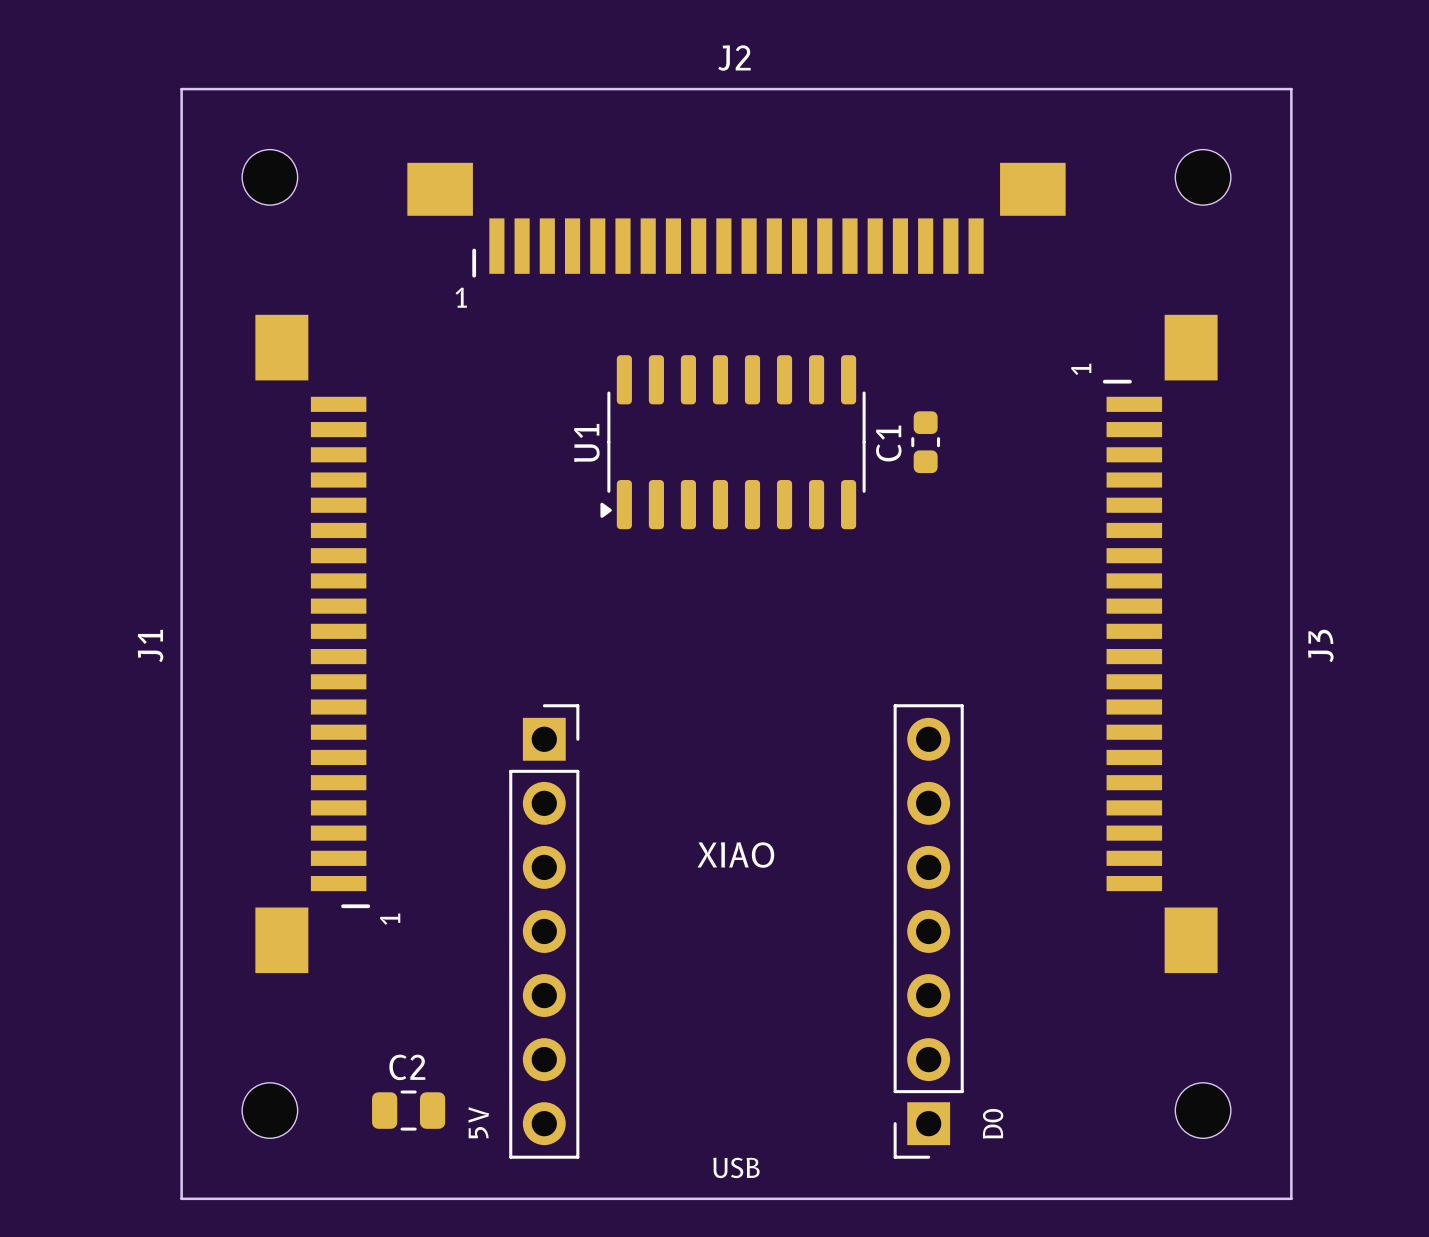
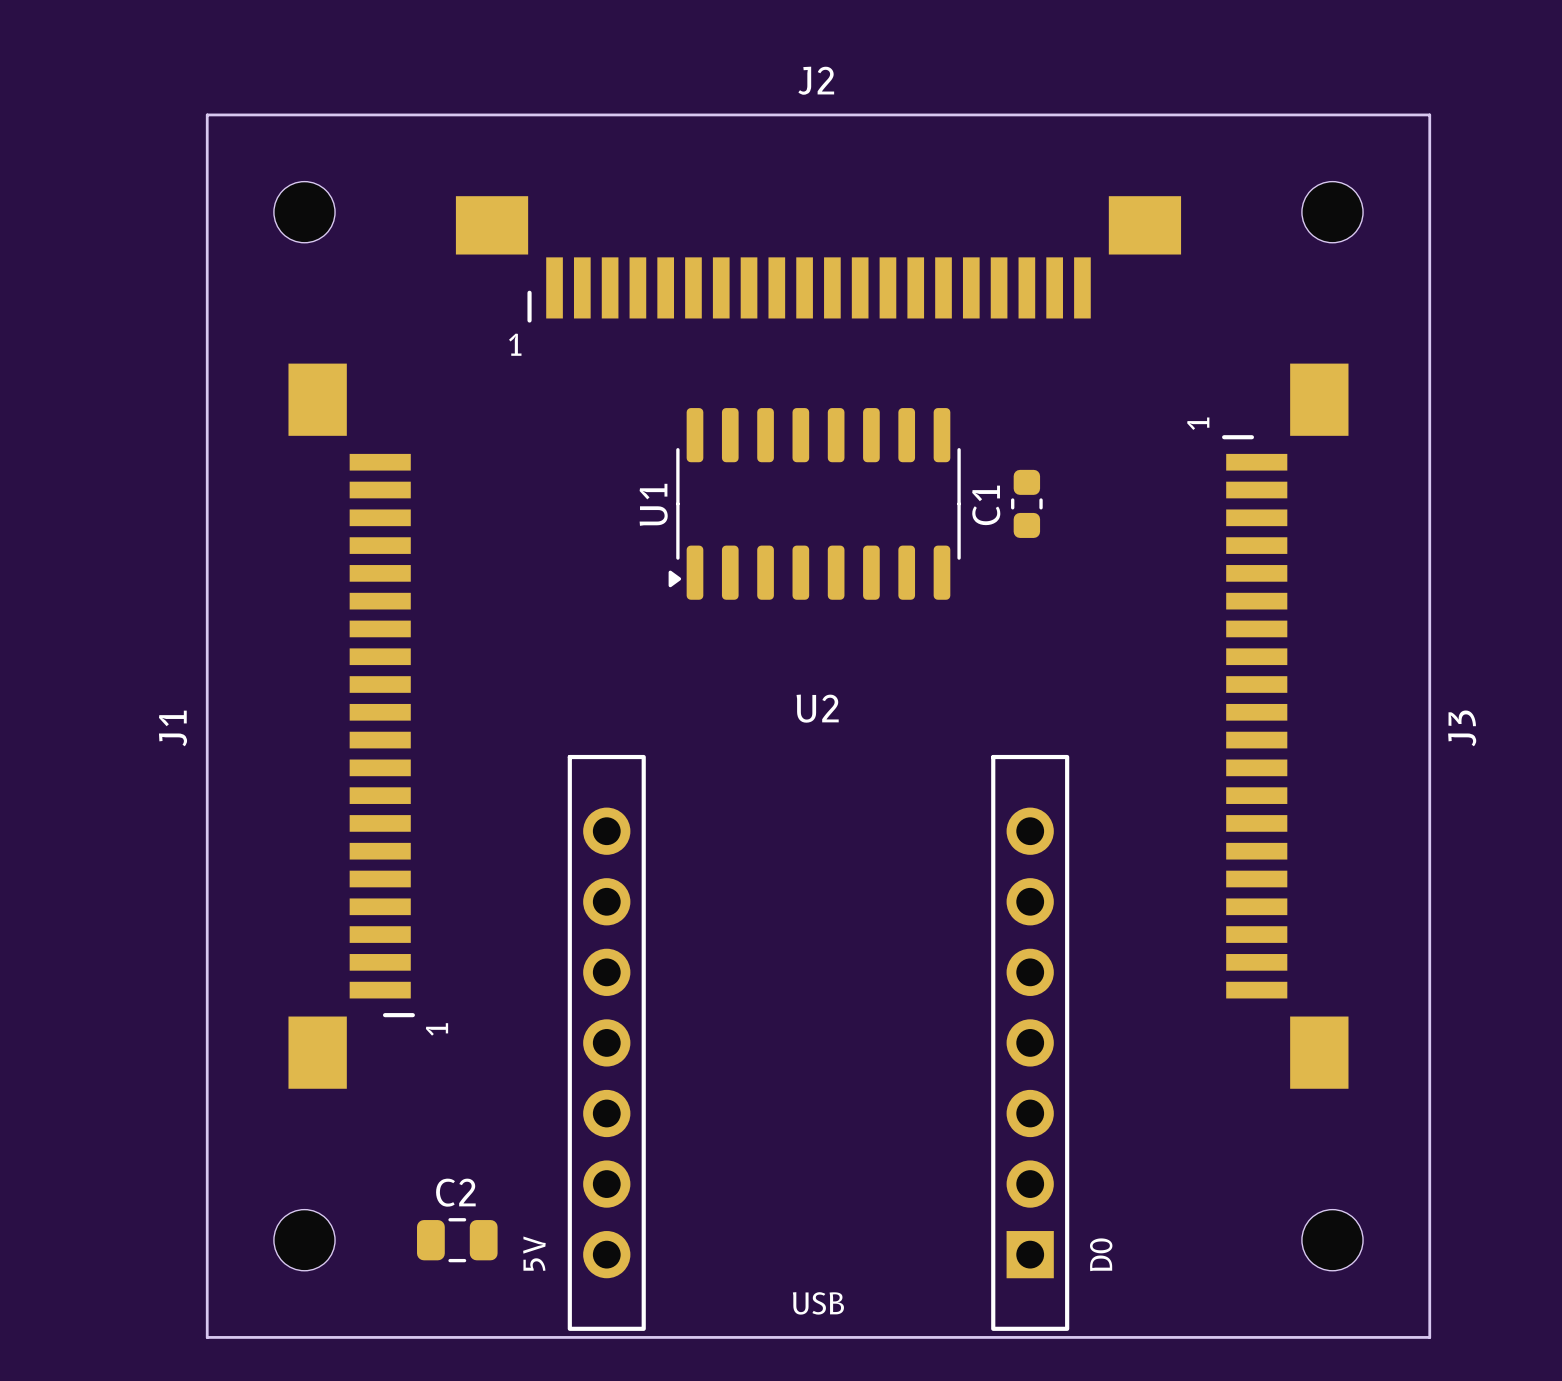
drawing: [468, 842, 1004, 1139] -> none
part: (544, 931) -> none
U2: none -> (818, 1042)
part: (928, 931) -> none

